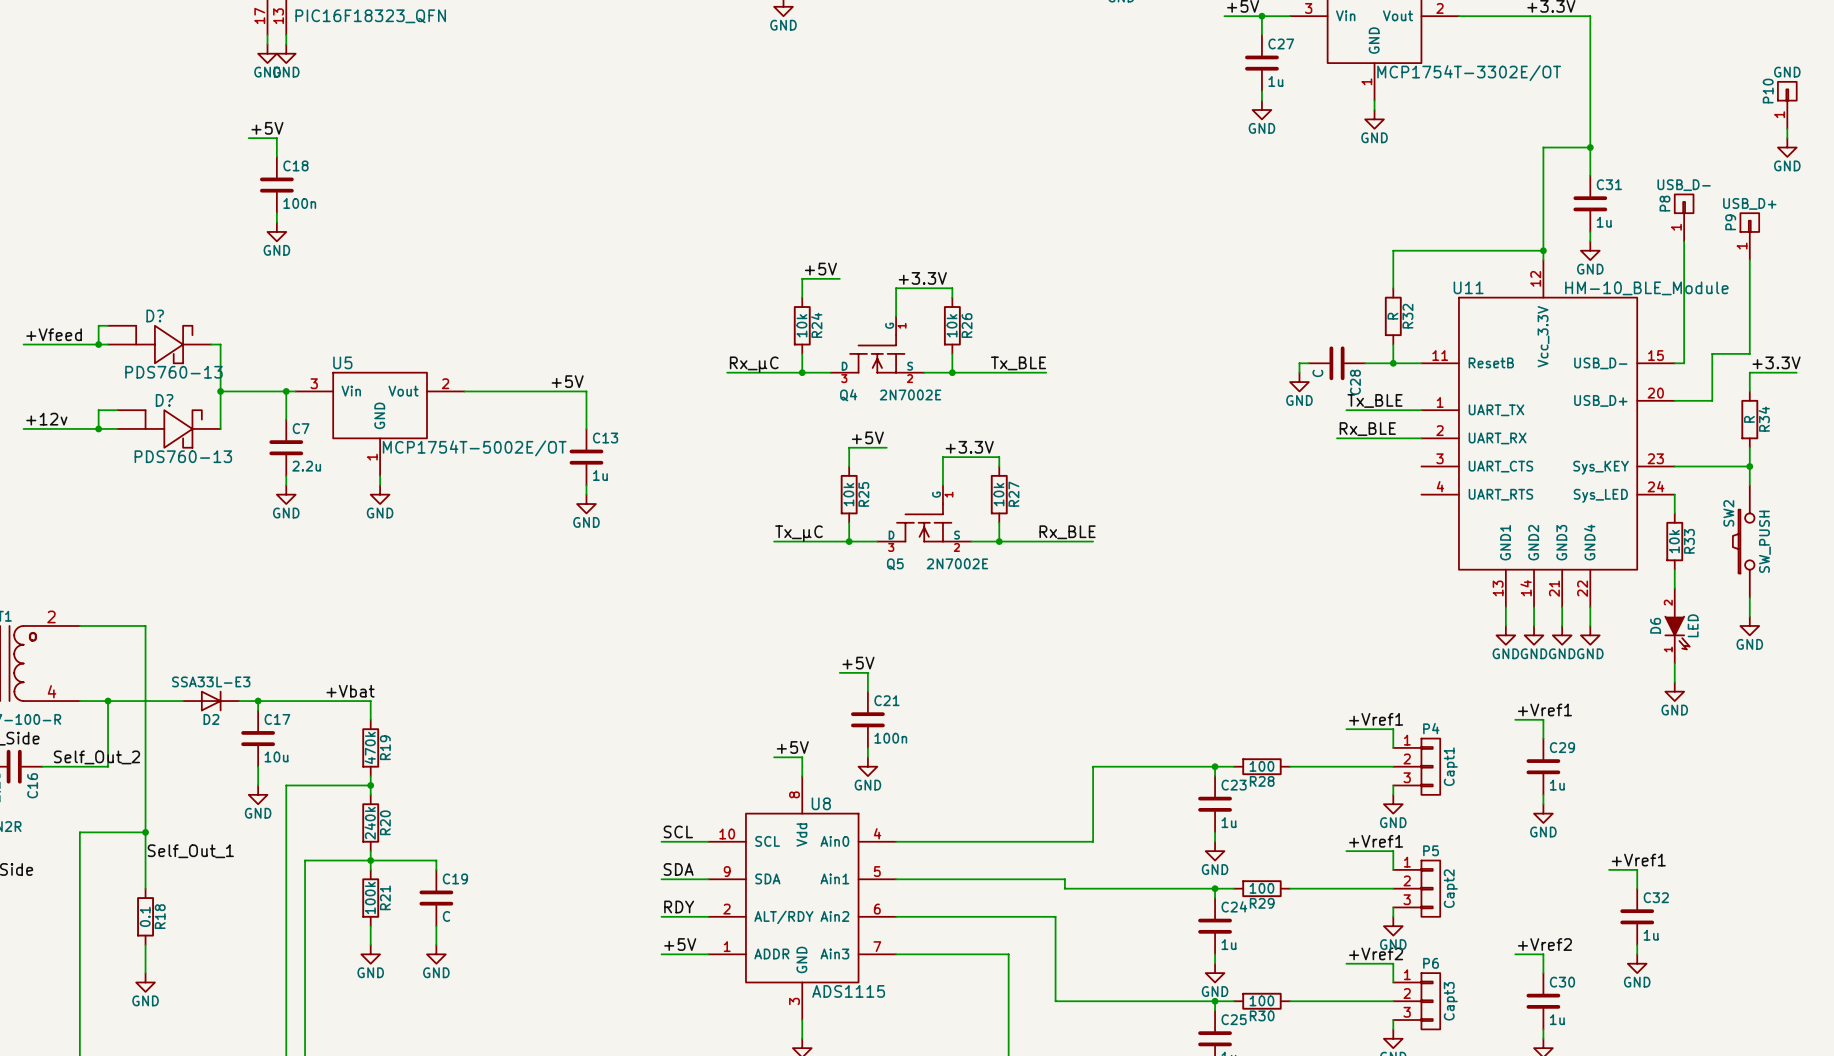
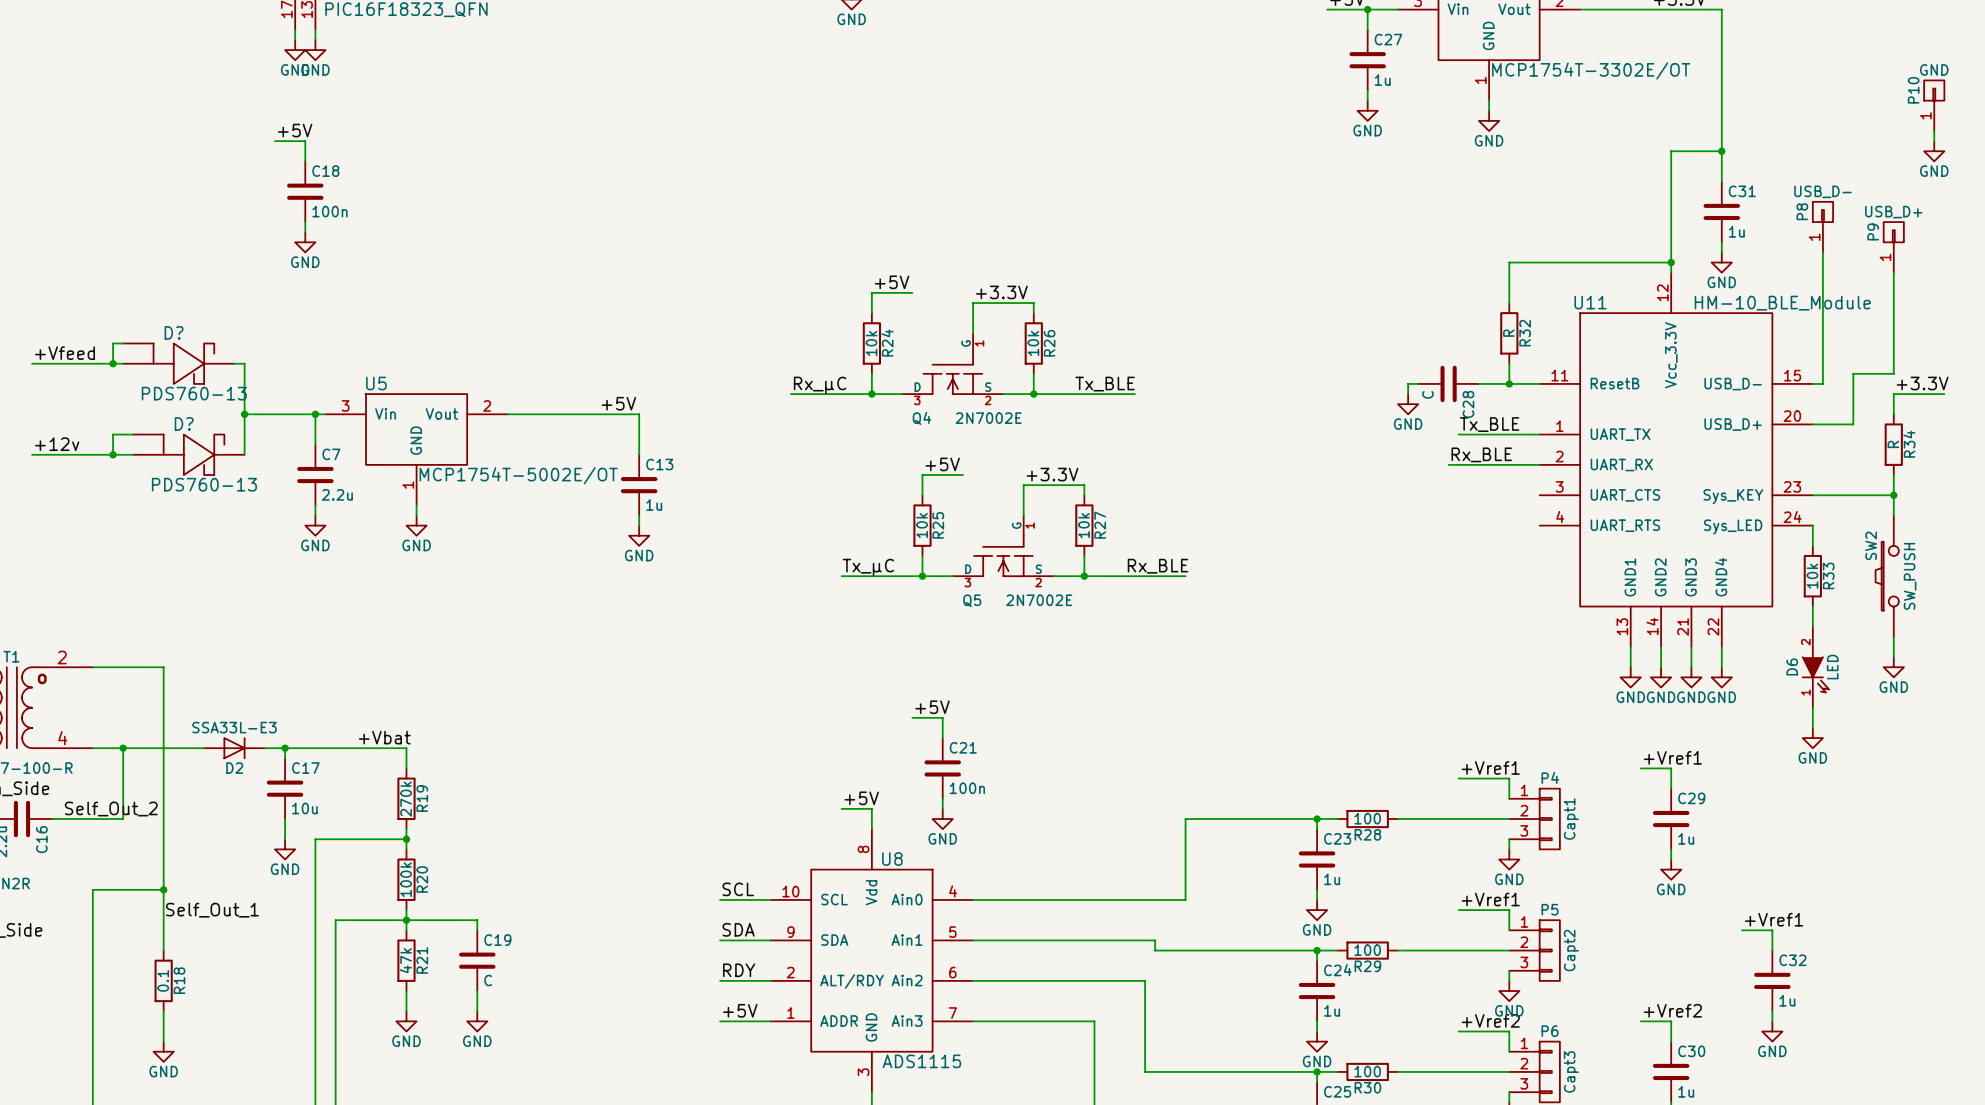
R19 value: 470k (370, 747) -> 270k (406, 799)
R20 value: 240k (370, 823) -> 100k (406, 879)
R21 value: 100k (370, 898) -> 47k (405, 960)

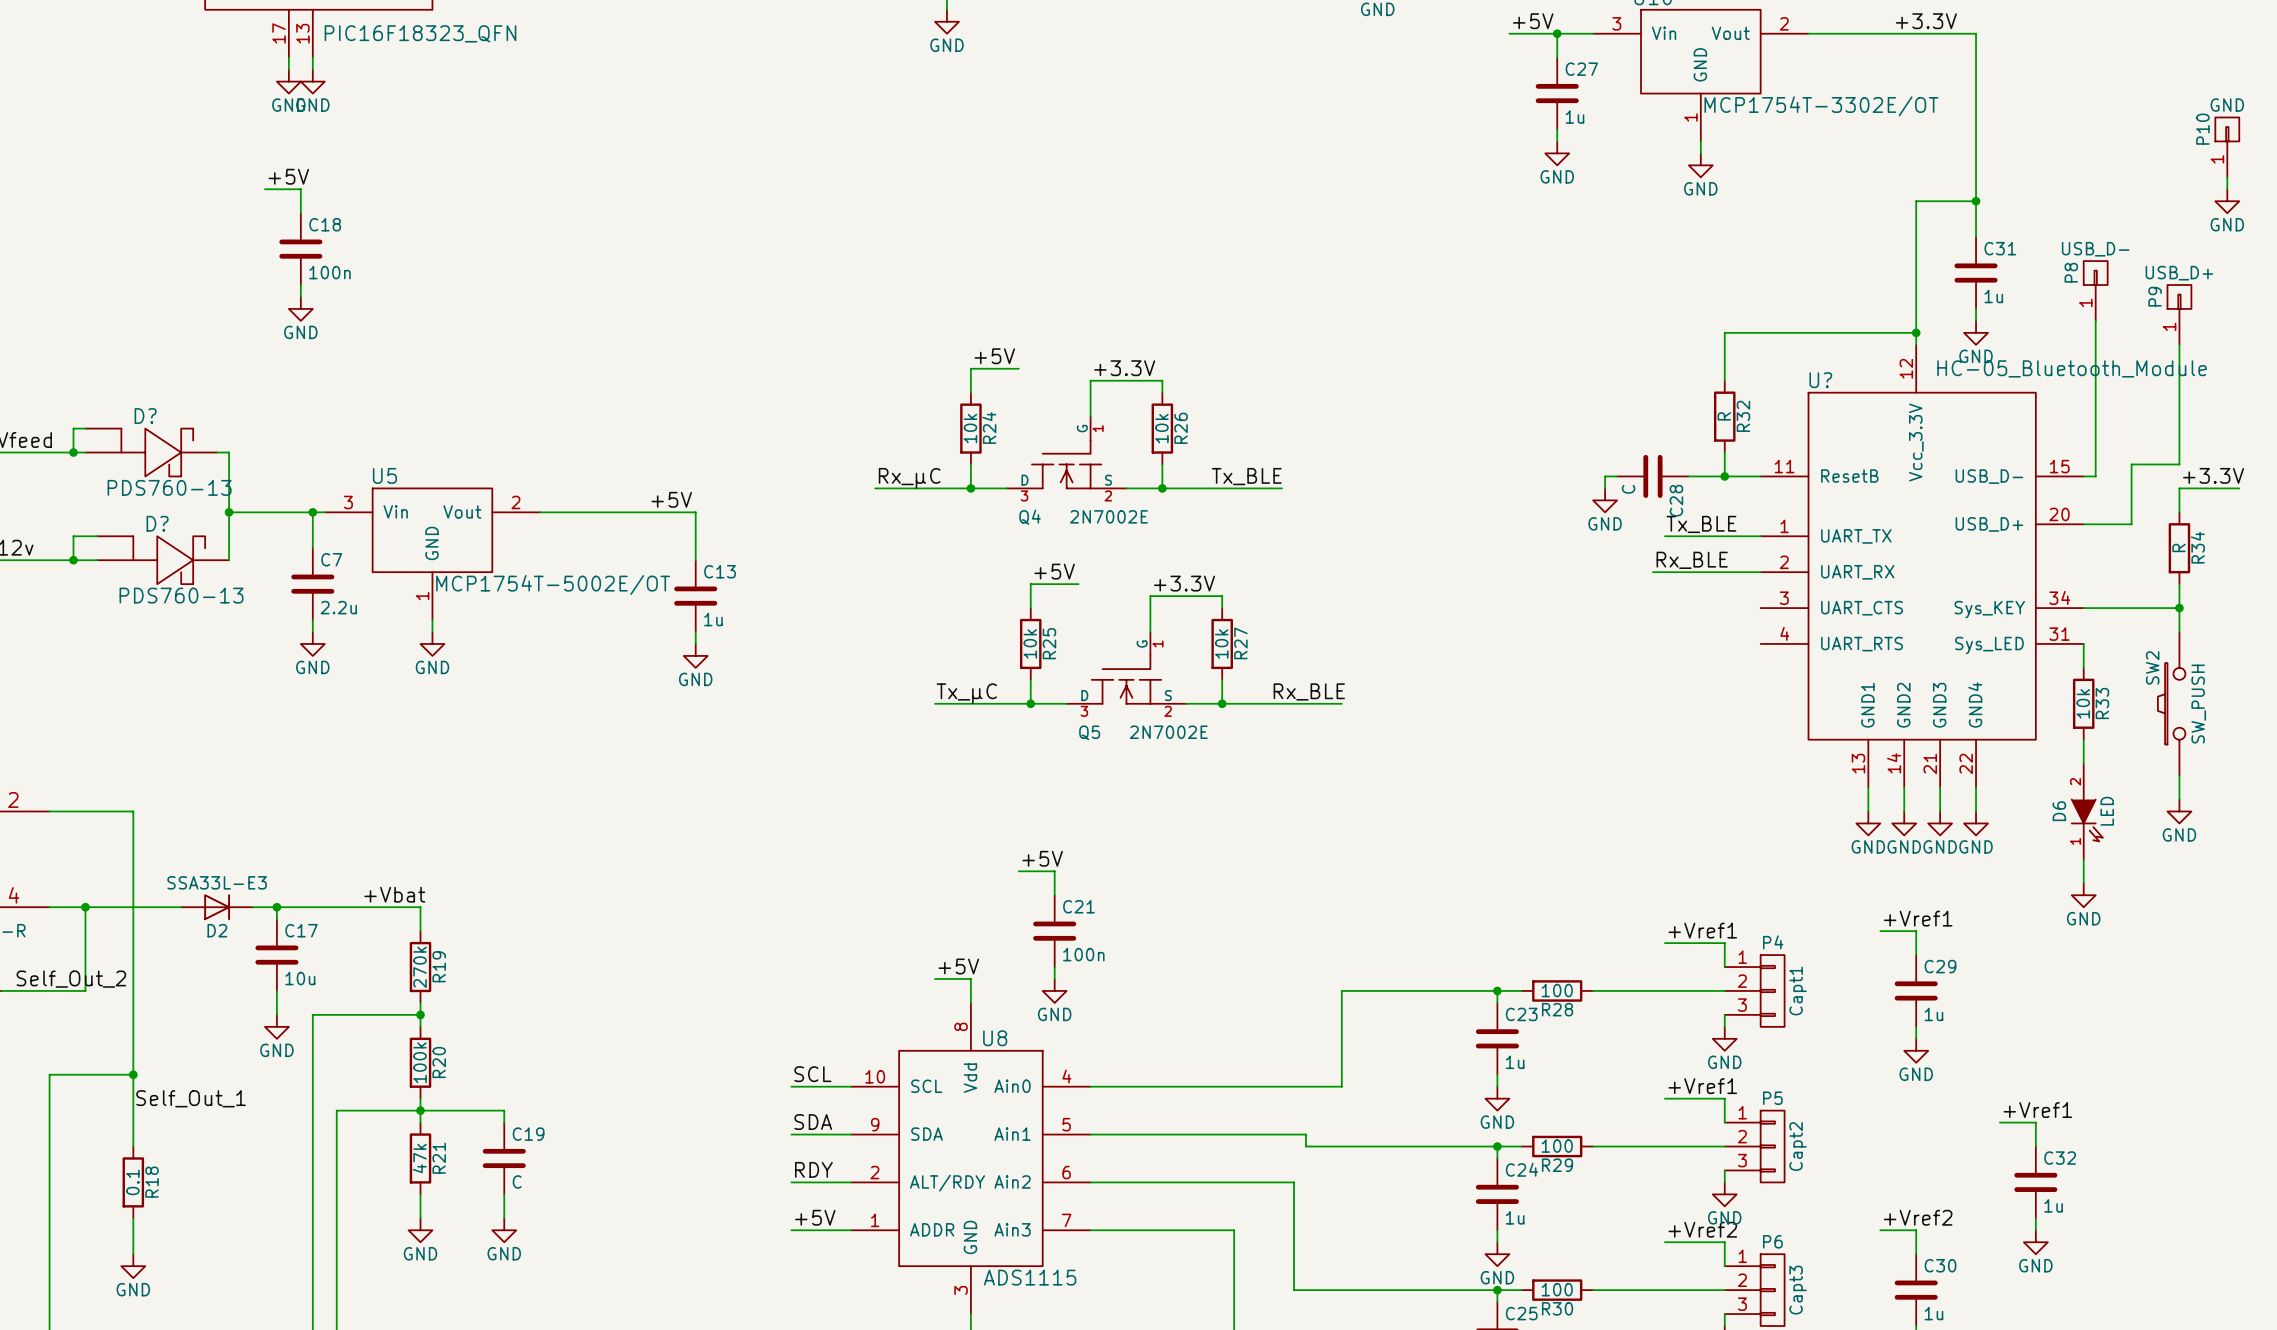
U11 name: U11 (1590, 302) -> U? (1820, 380)
U11 value: HM-10_BLE_Module (1782, 303) -> HC-05_Bluetooth_Module (2072, 368)
U11 pin number: 23 (1792, 486) -> 34 (2059, 597)
U11 pin number: 24 (1792, 517) -> 31 (2059, 634)

